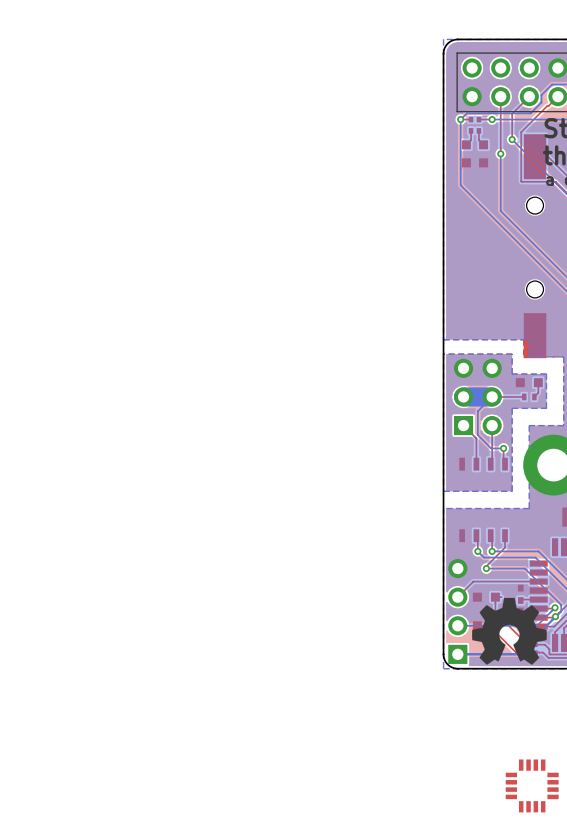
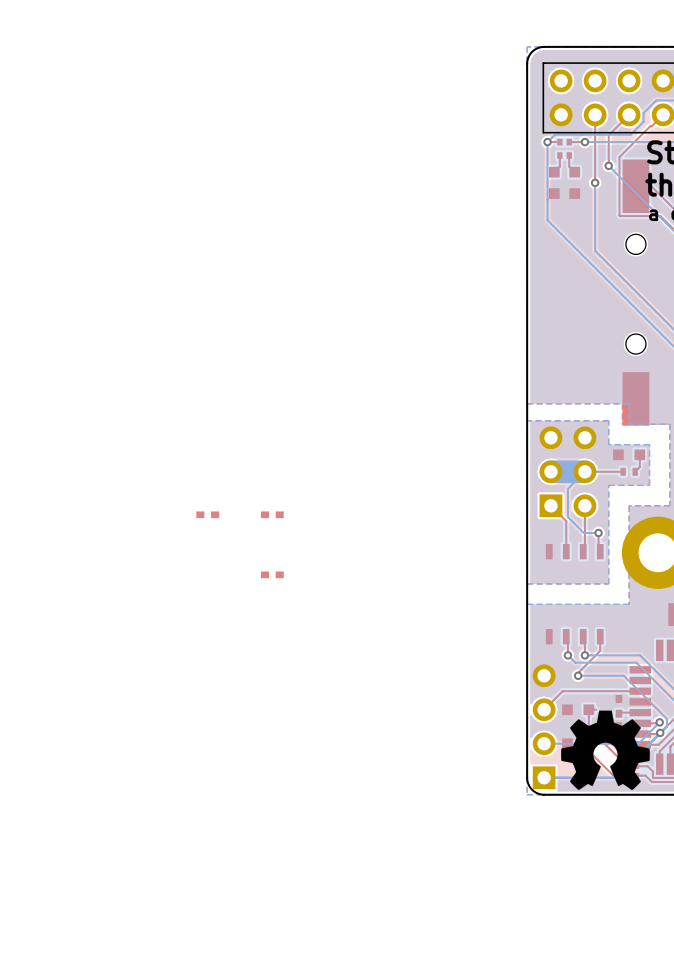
part: none -> (207, 514)
part: none -> (272, 514)
part: none -> (272, 574)
part: (532, 785) -> none

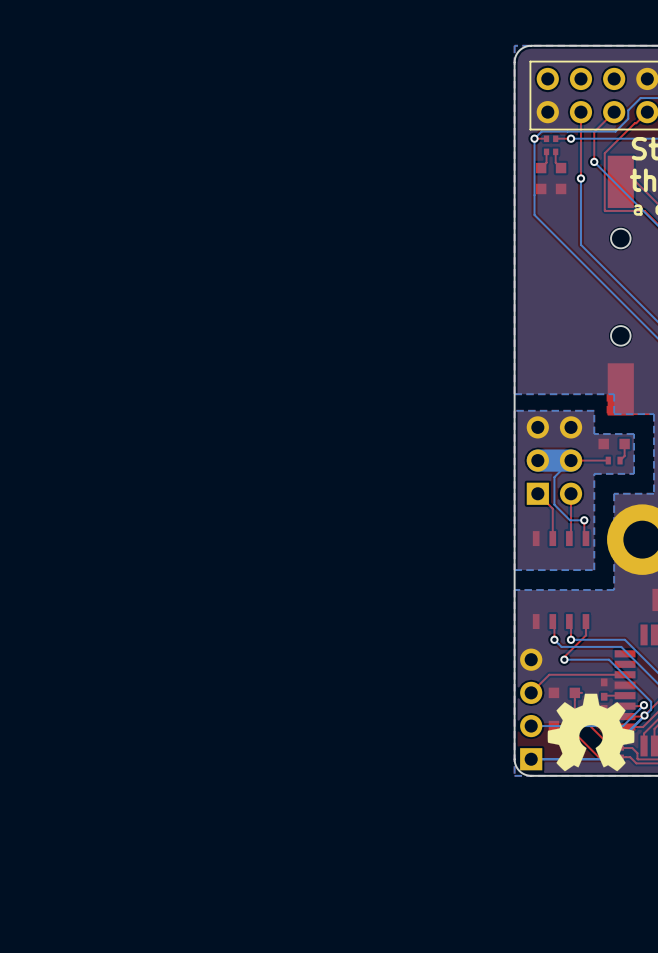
part: (207, 514) -> none
part: (272, 514) -> none
part: (272, 574) -> none

